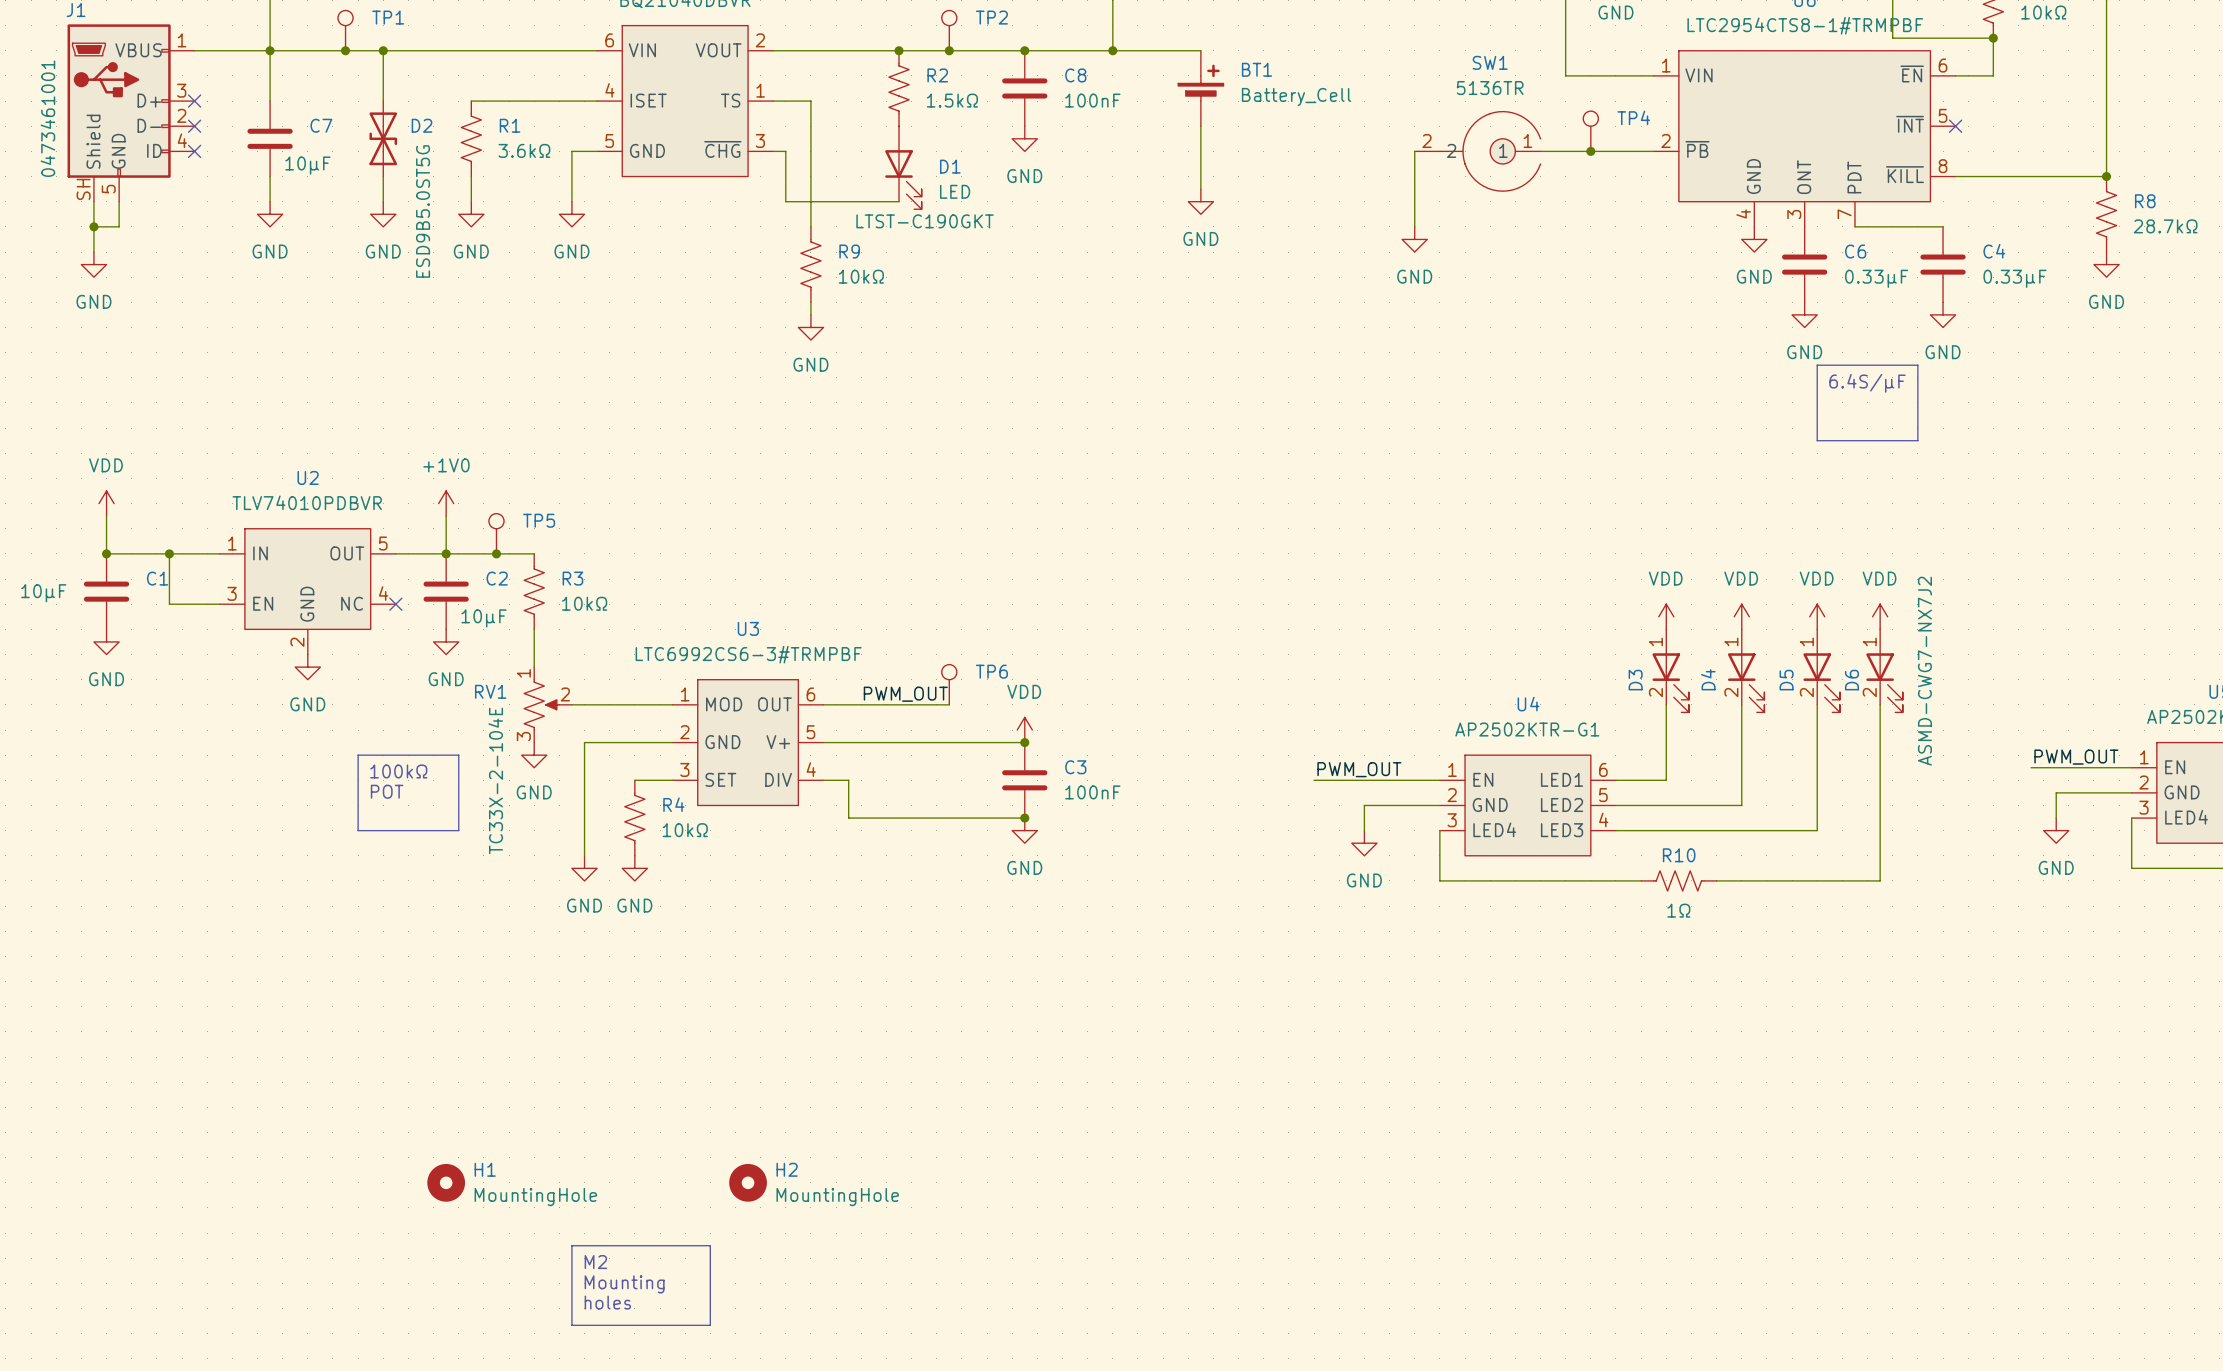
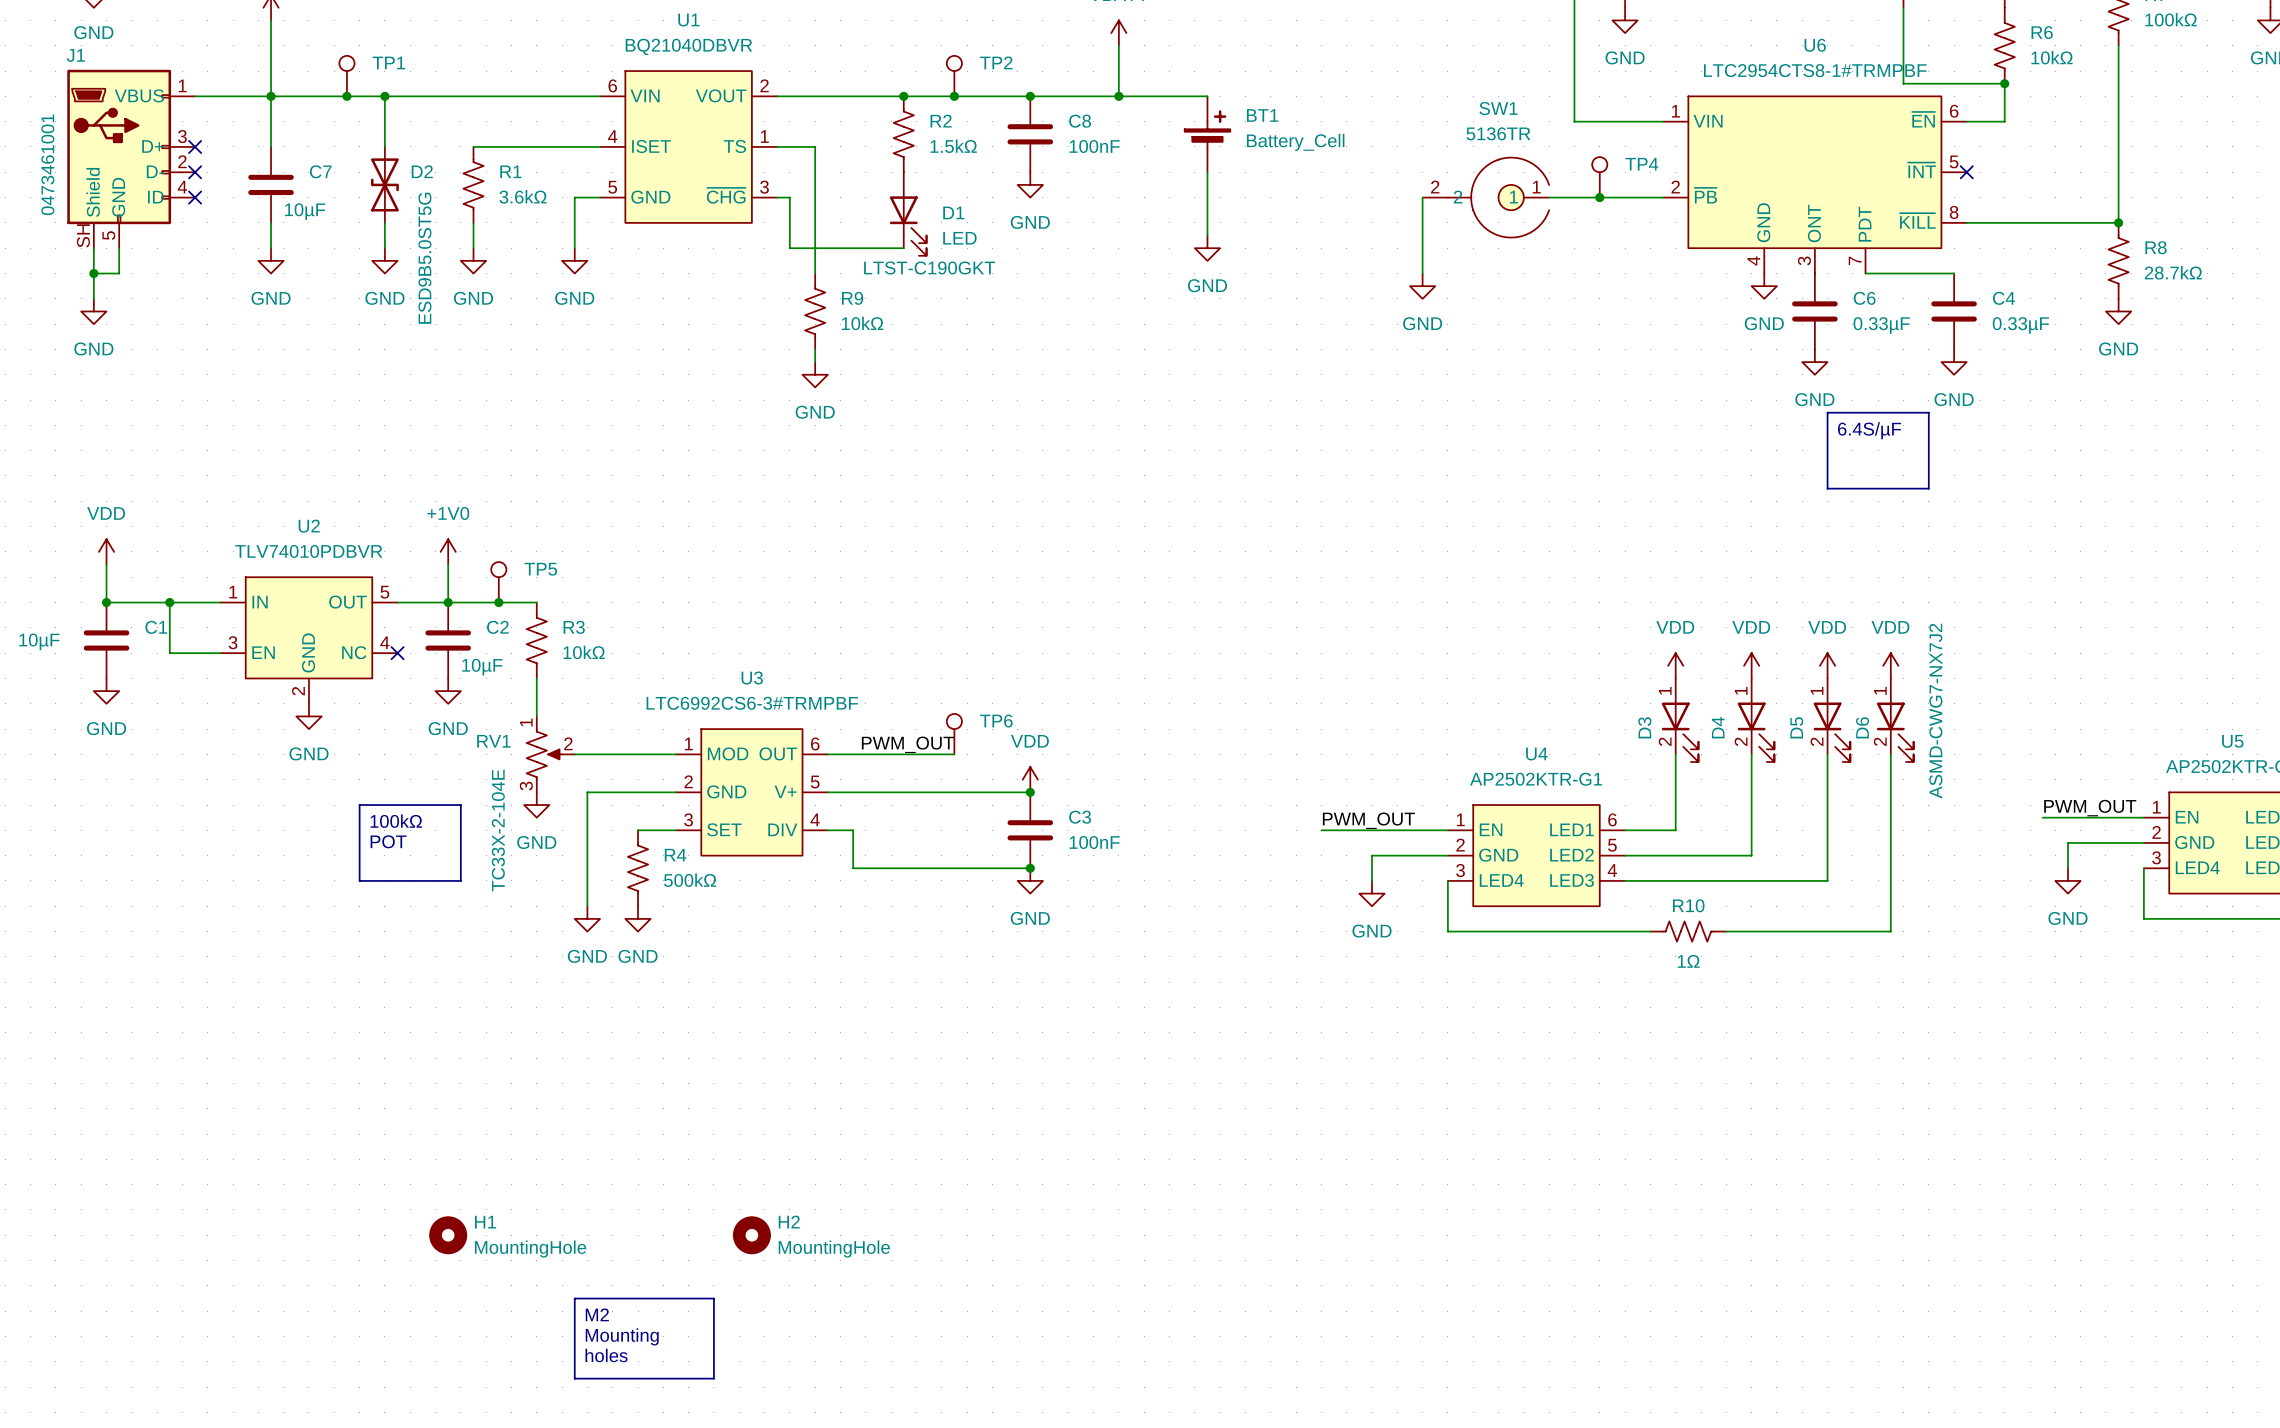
R4 value: 10kΩ (685, 830) -> 500kΩ (690, 880)

